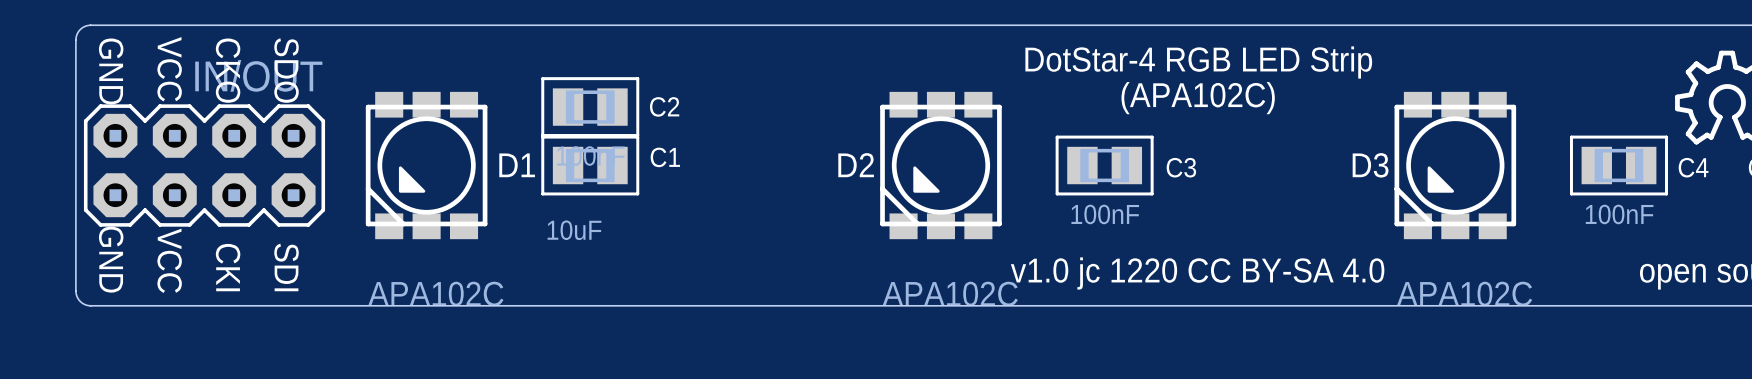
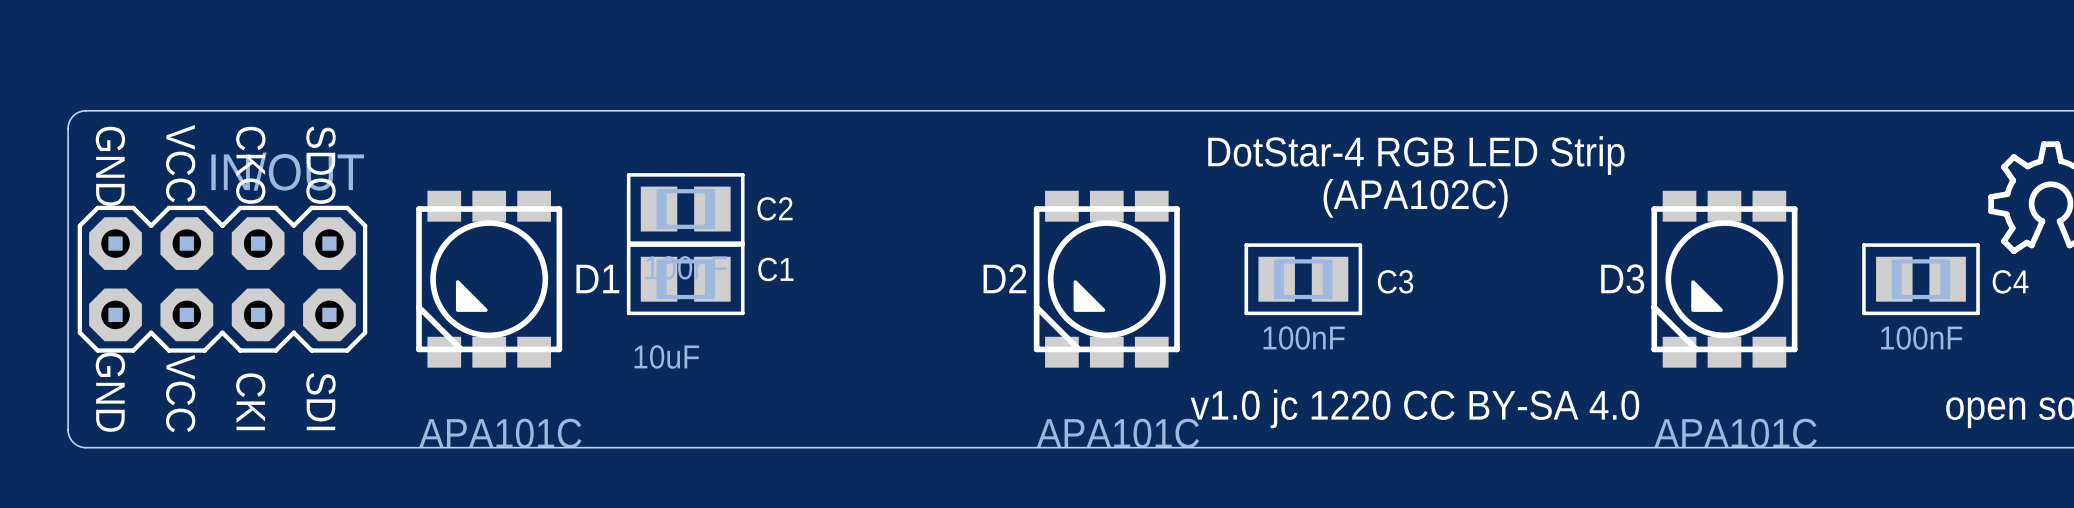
D1 value: APA102C (435, 293) -> APA101C (500, 433)
D2 value: APA102C (950, 293) -> APA101C (1117, 433)
D3 value: APA102C (1464, 293) -> APA101C (1735, 433)

